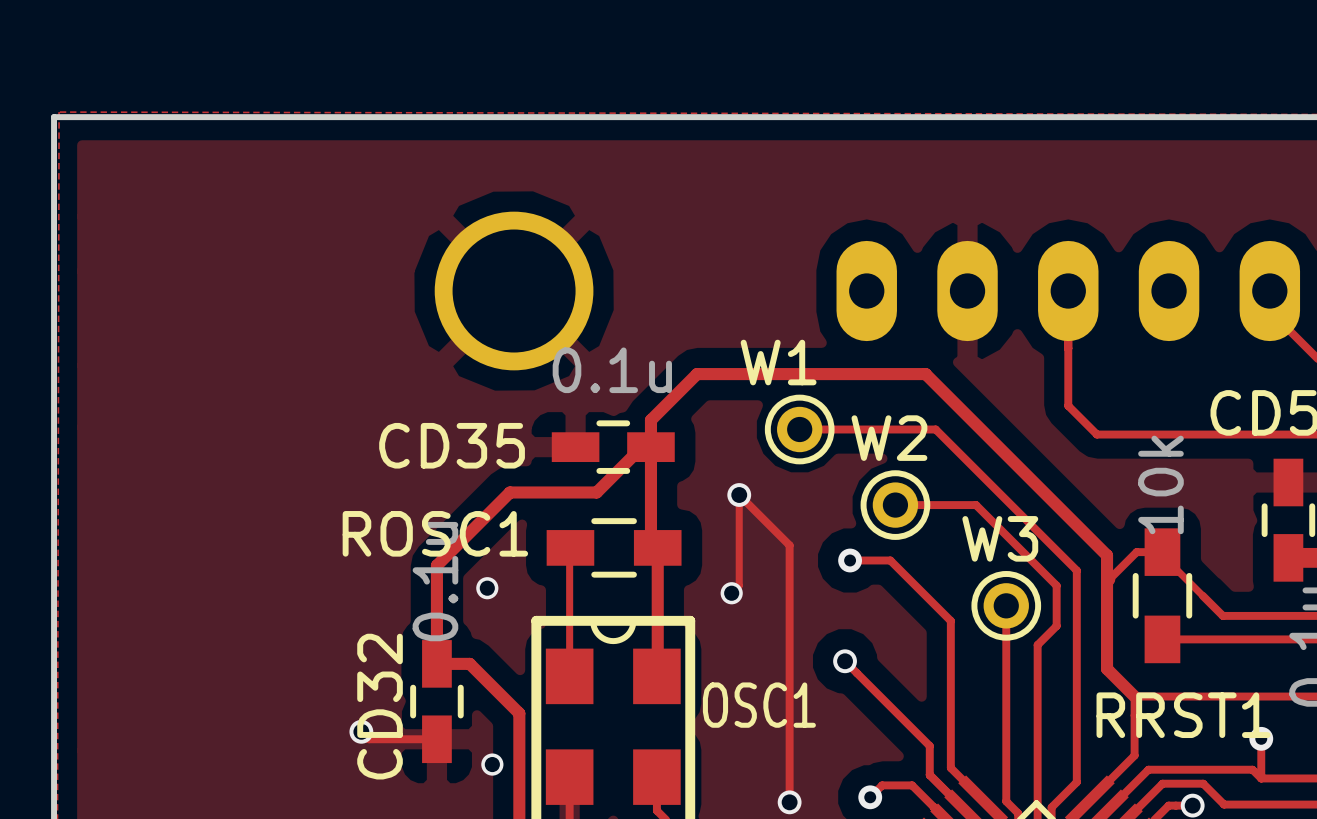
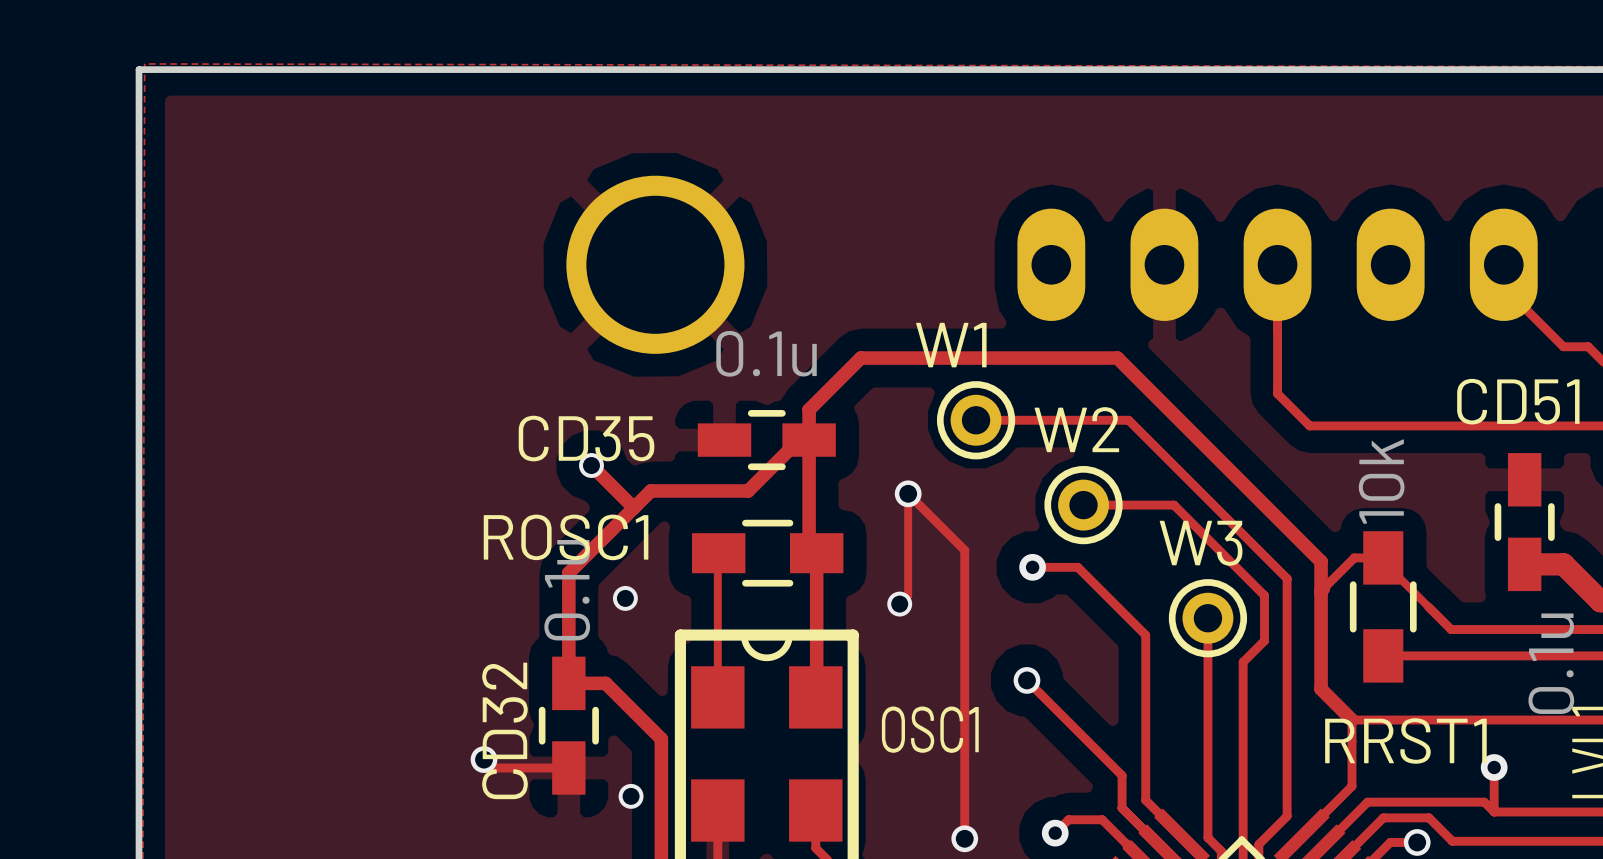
track: none -> (591, 465) (633, 507)
via: none -> (591, 465)

